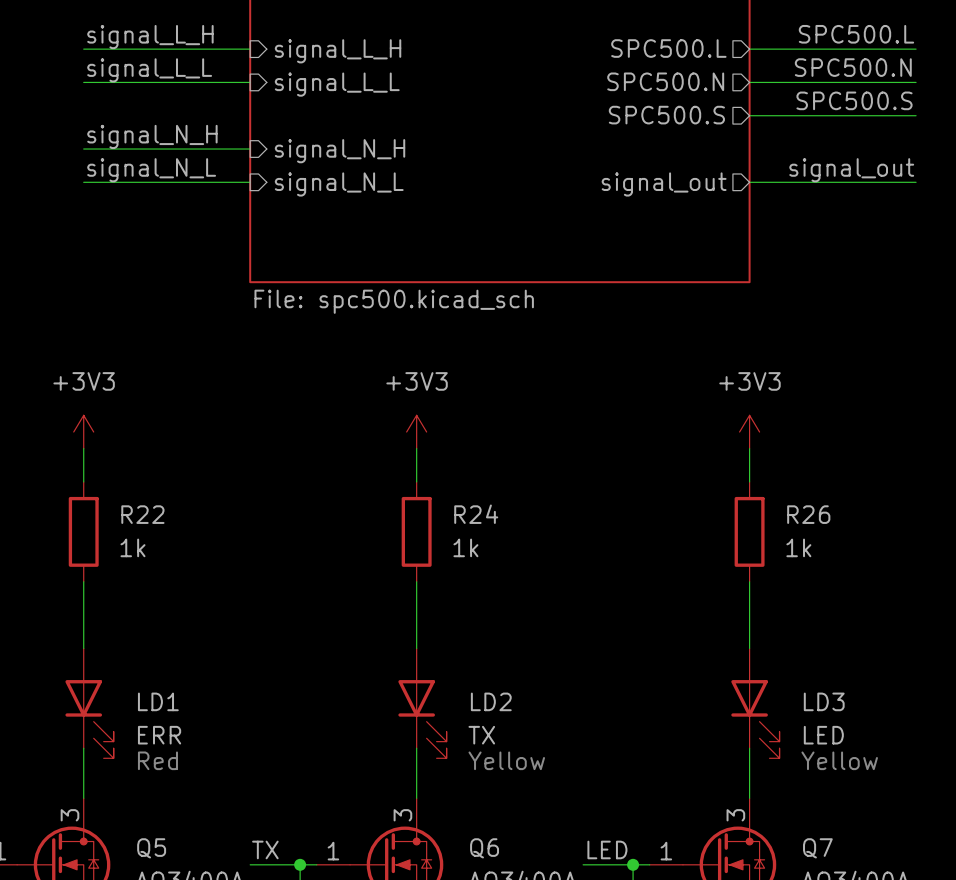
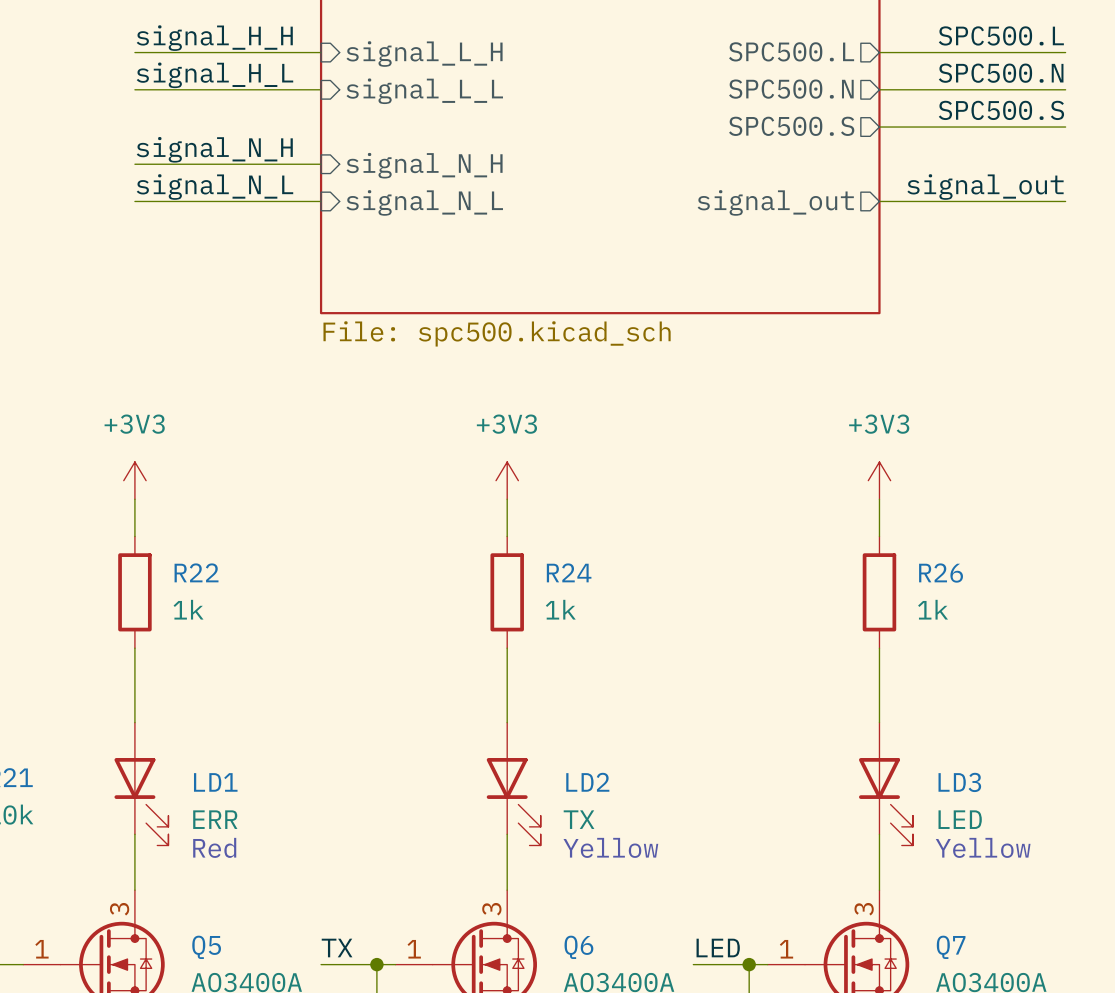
label: signal_L_H (150, 37) -> signal_H_H (214, 38)
label: signal_L_L (149, 70) -> signal_H_L (214, 75)

